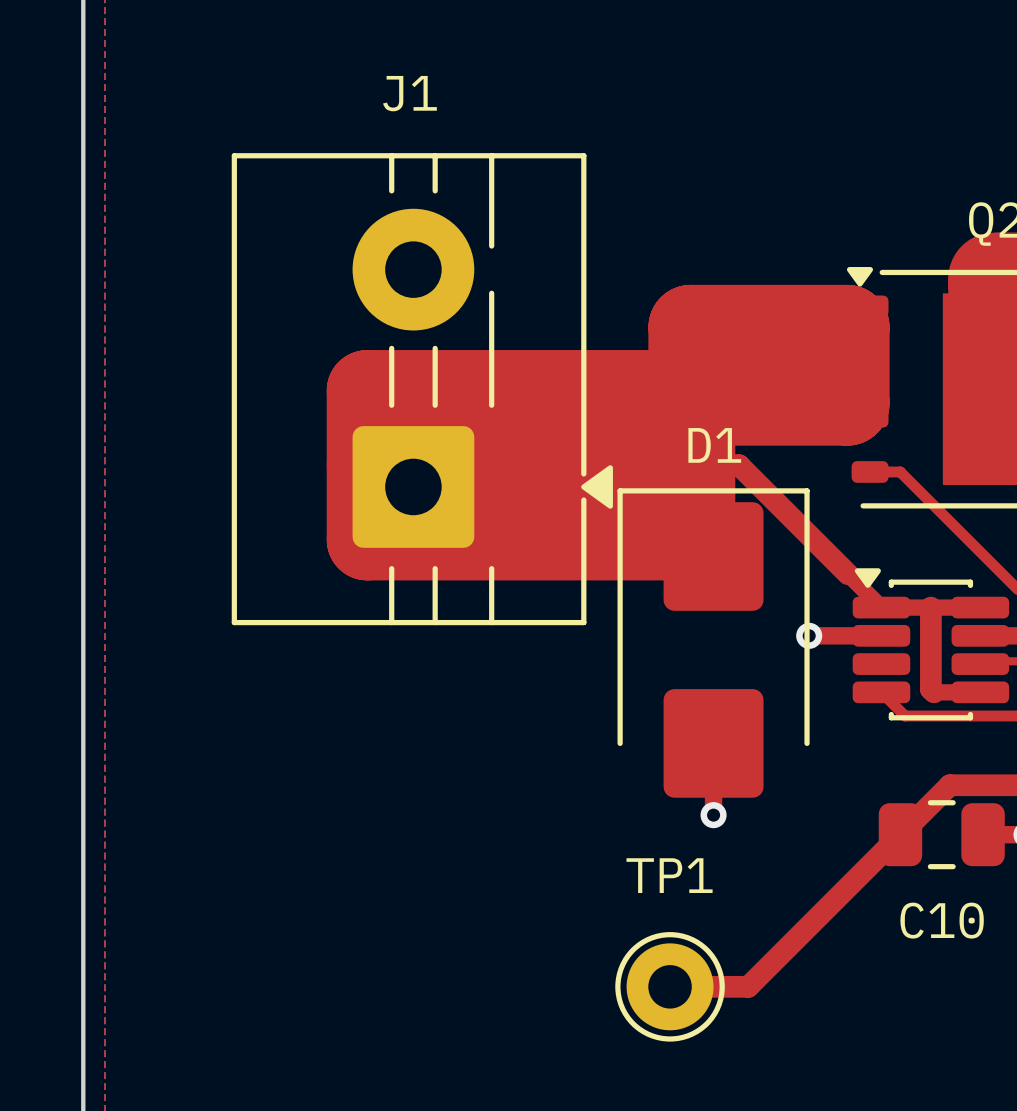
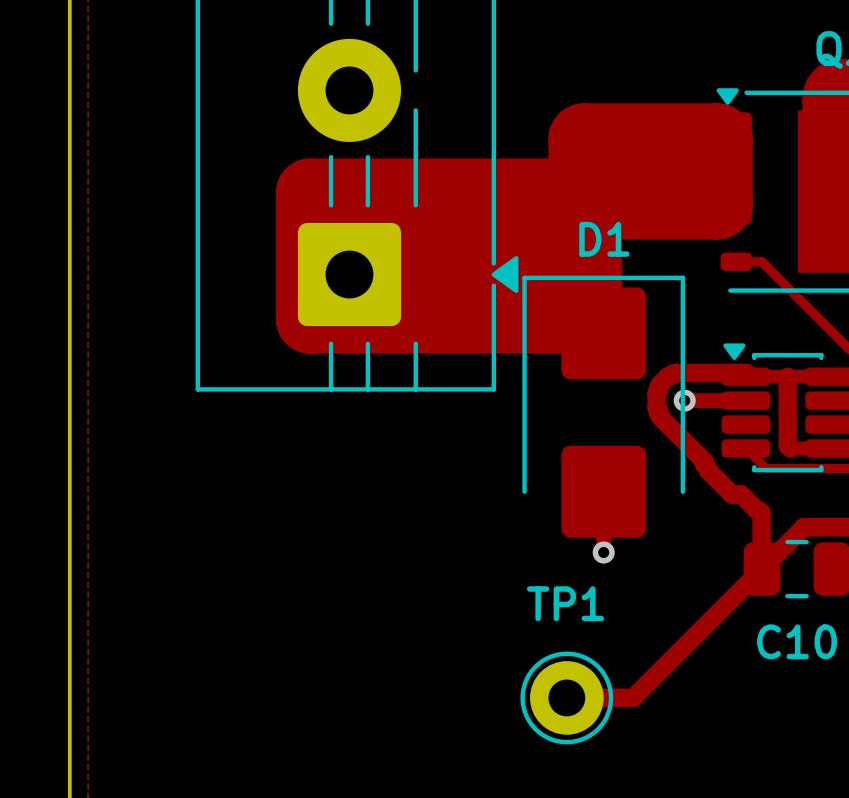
top track: (713, 556) (713, 484) (694, 465) (739, 465) (881, 607) -> (762, 569) (761, 512) (741, 494) (732, 494) (708, 470) (704, 461) (660, 417) (656, 408) (656, 393) (660, 384) (675, 373) (746, 373) (746, 376)

